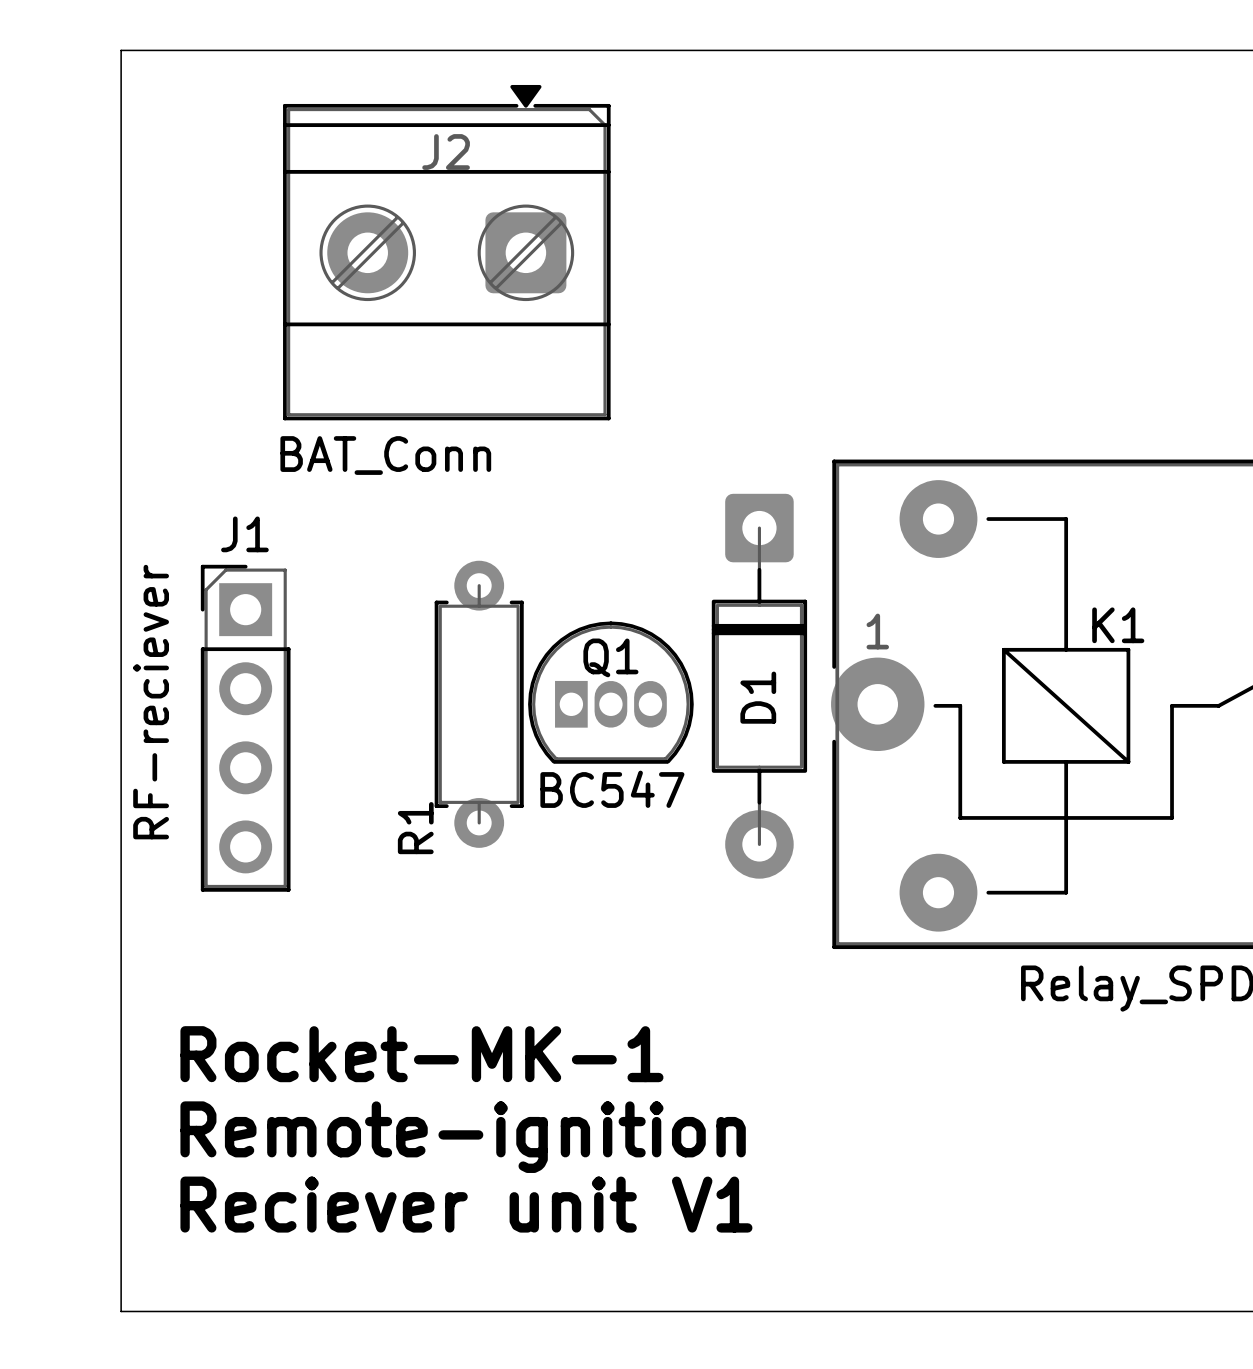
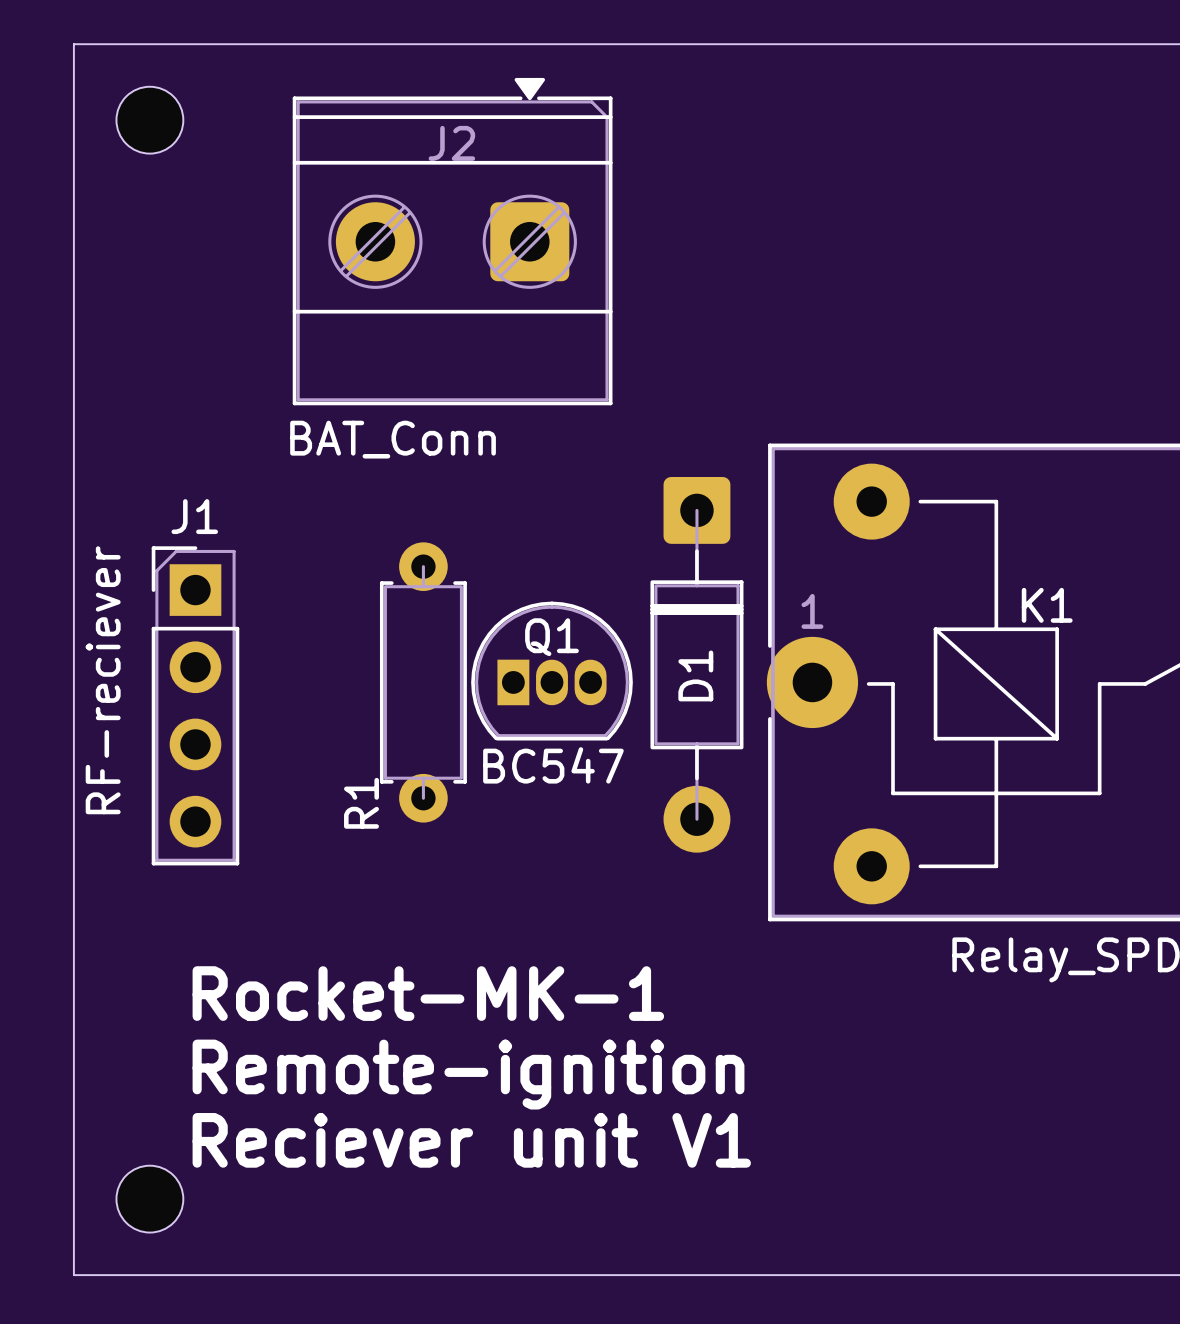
part: none -> (149, 120)
J2 position: (446, 252) -> (452, 241)
text position: Rocket-MK-1 (421, 1054) -> Rocket-MK-1 (428, 993)
text position: Remote-ignition (463, 1137) -> Remote-ignition (468, 1074)
text position: Reciever unit V1 (466, 1204) -> Reciever unit V1 (471, 1140)
part: none -> (149, 1199)

